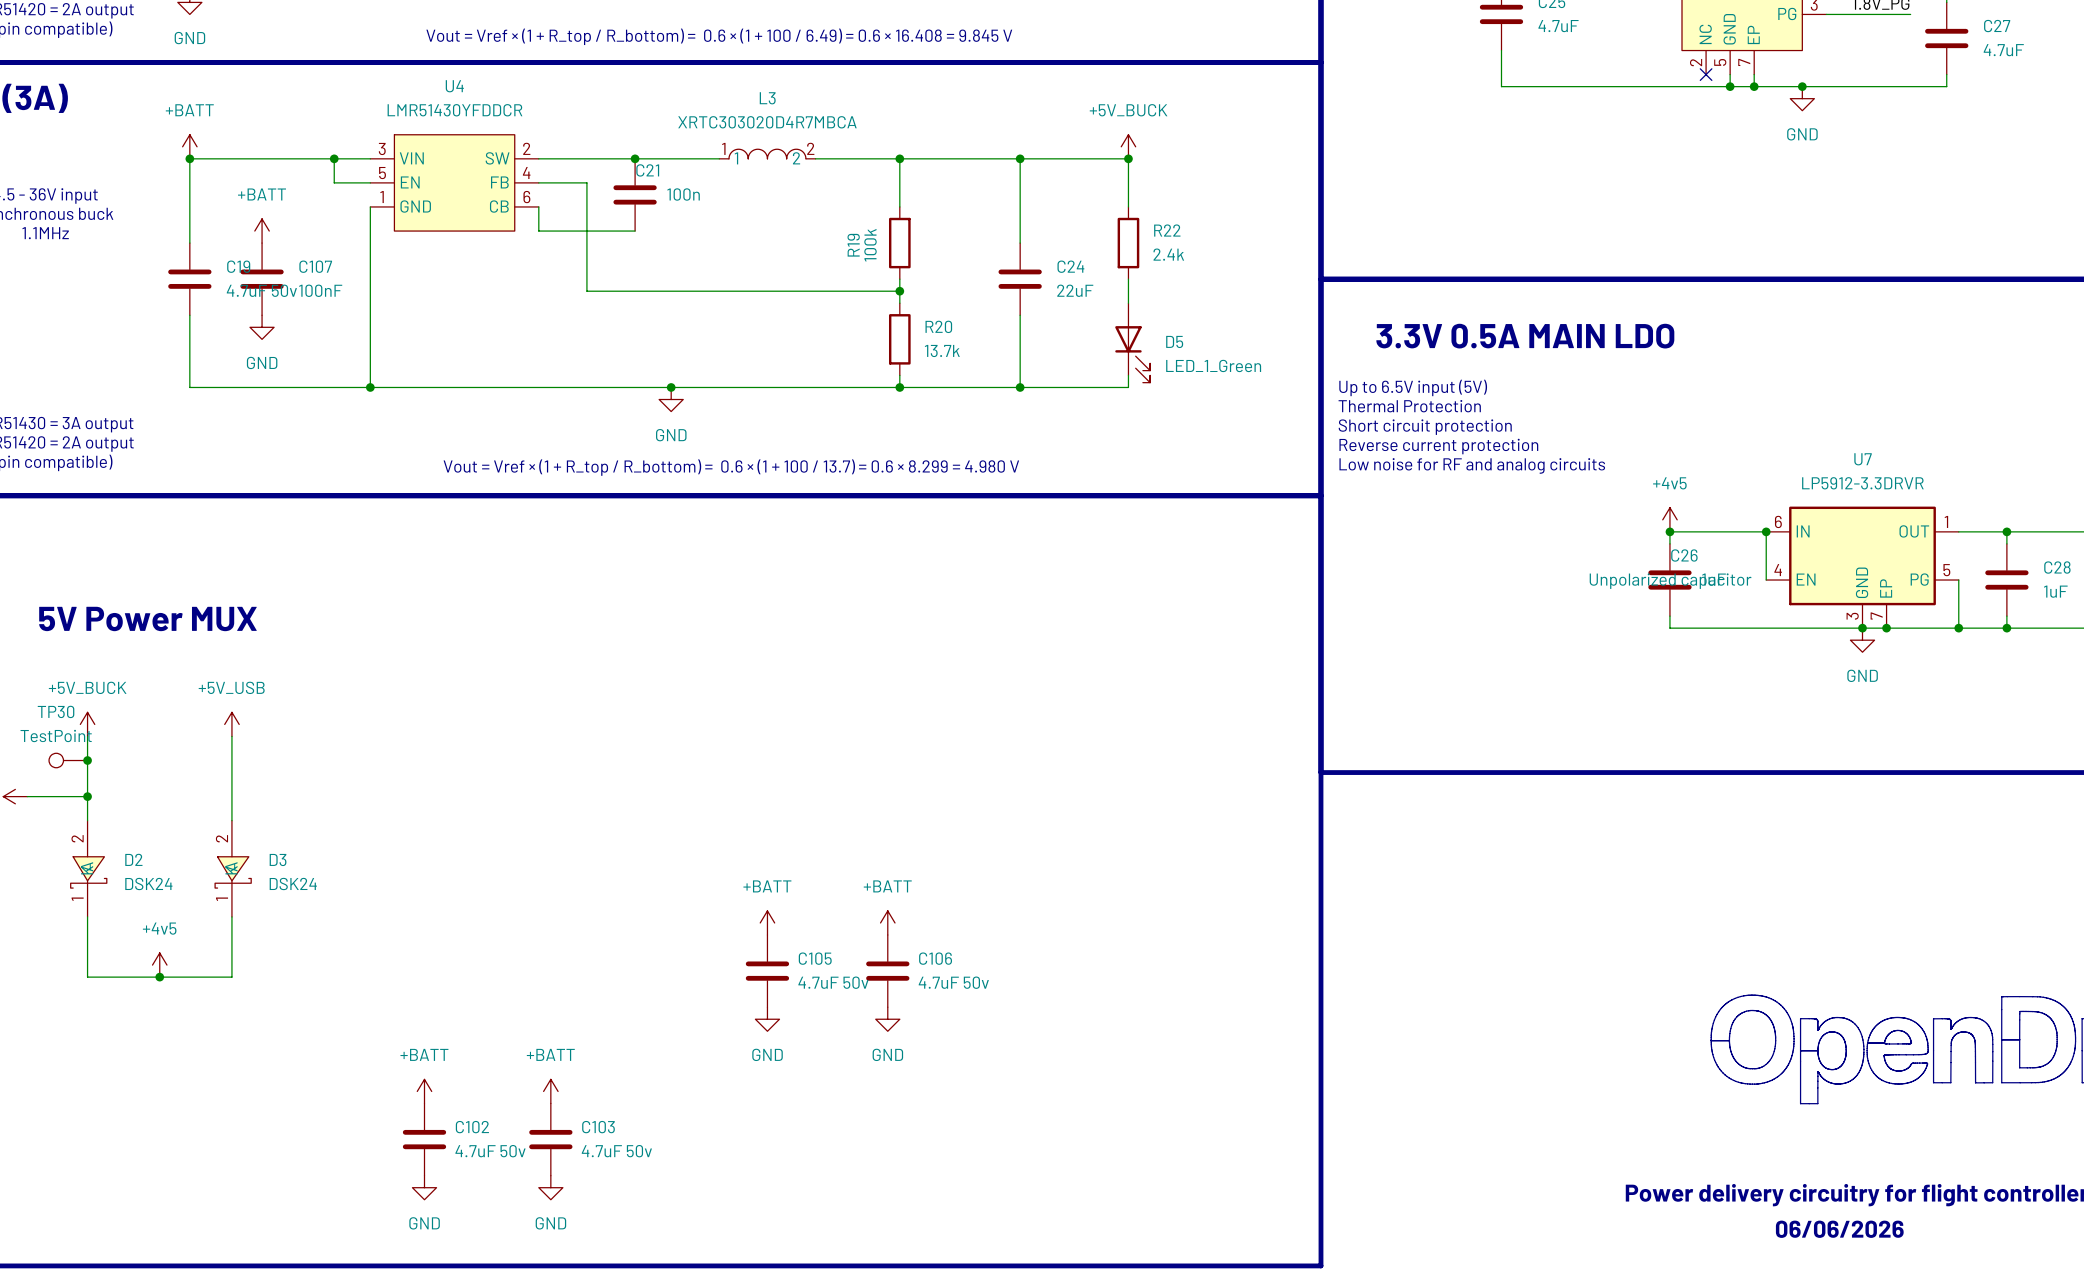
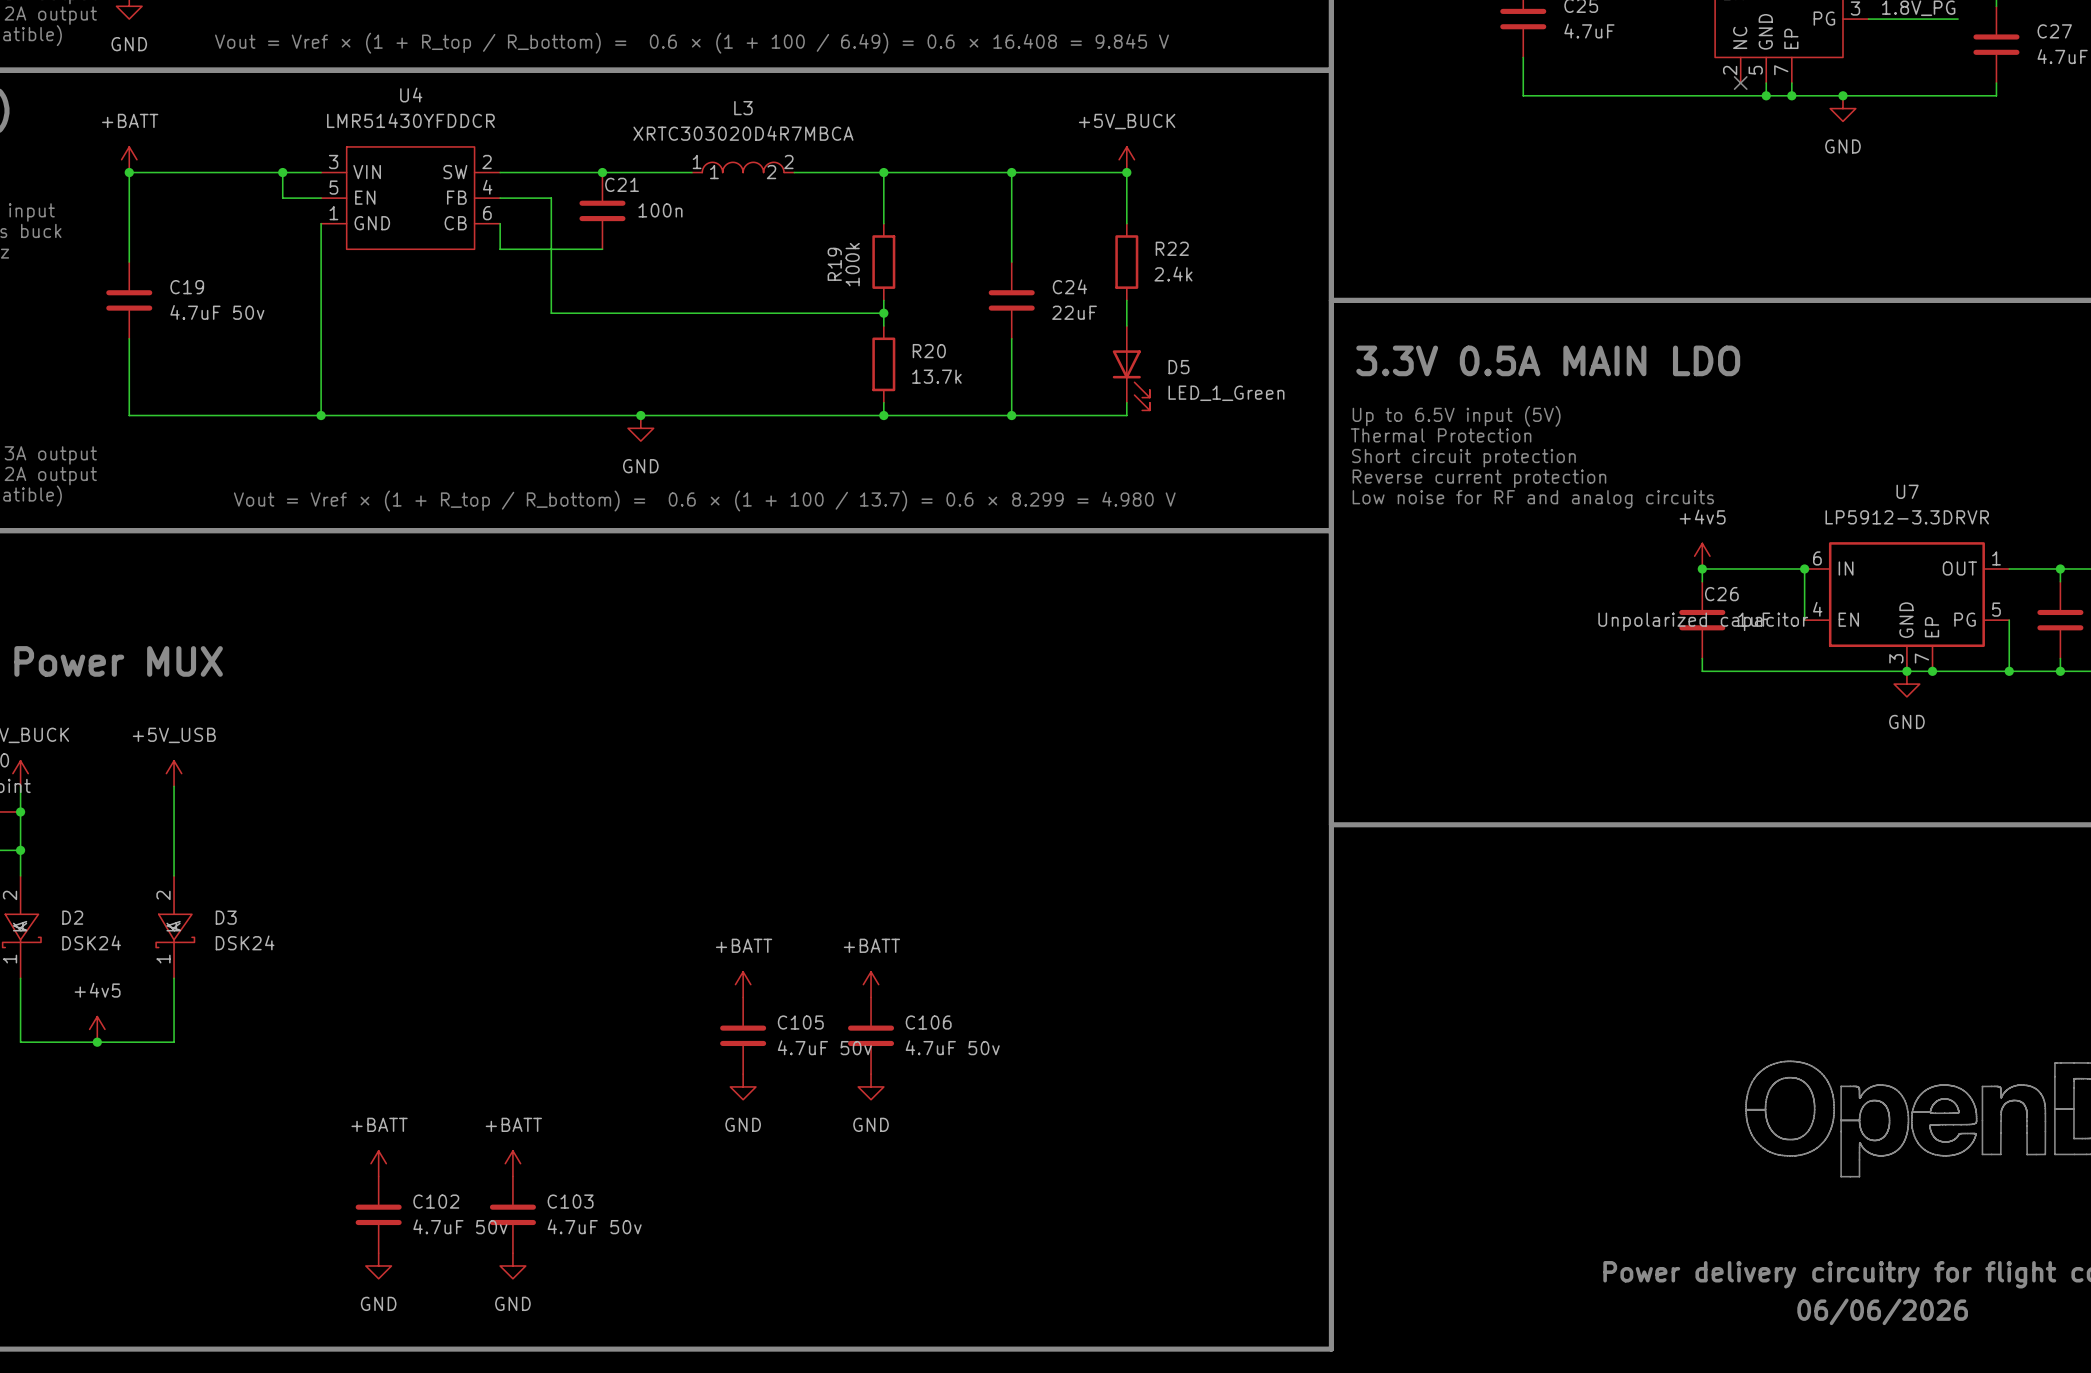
power symbol: +BATT (262, 231) -> none
C107: 100nF (262, 279) -> none
power symbol: GND (262, 327) -> none

